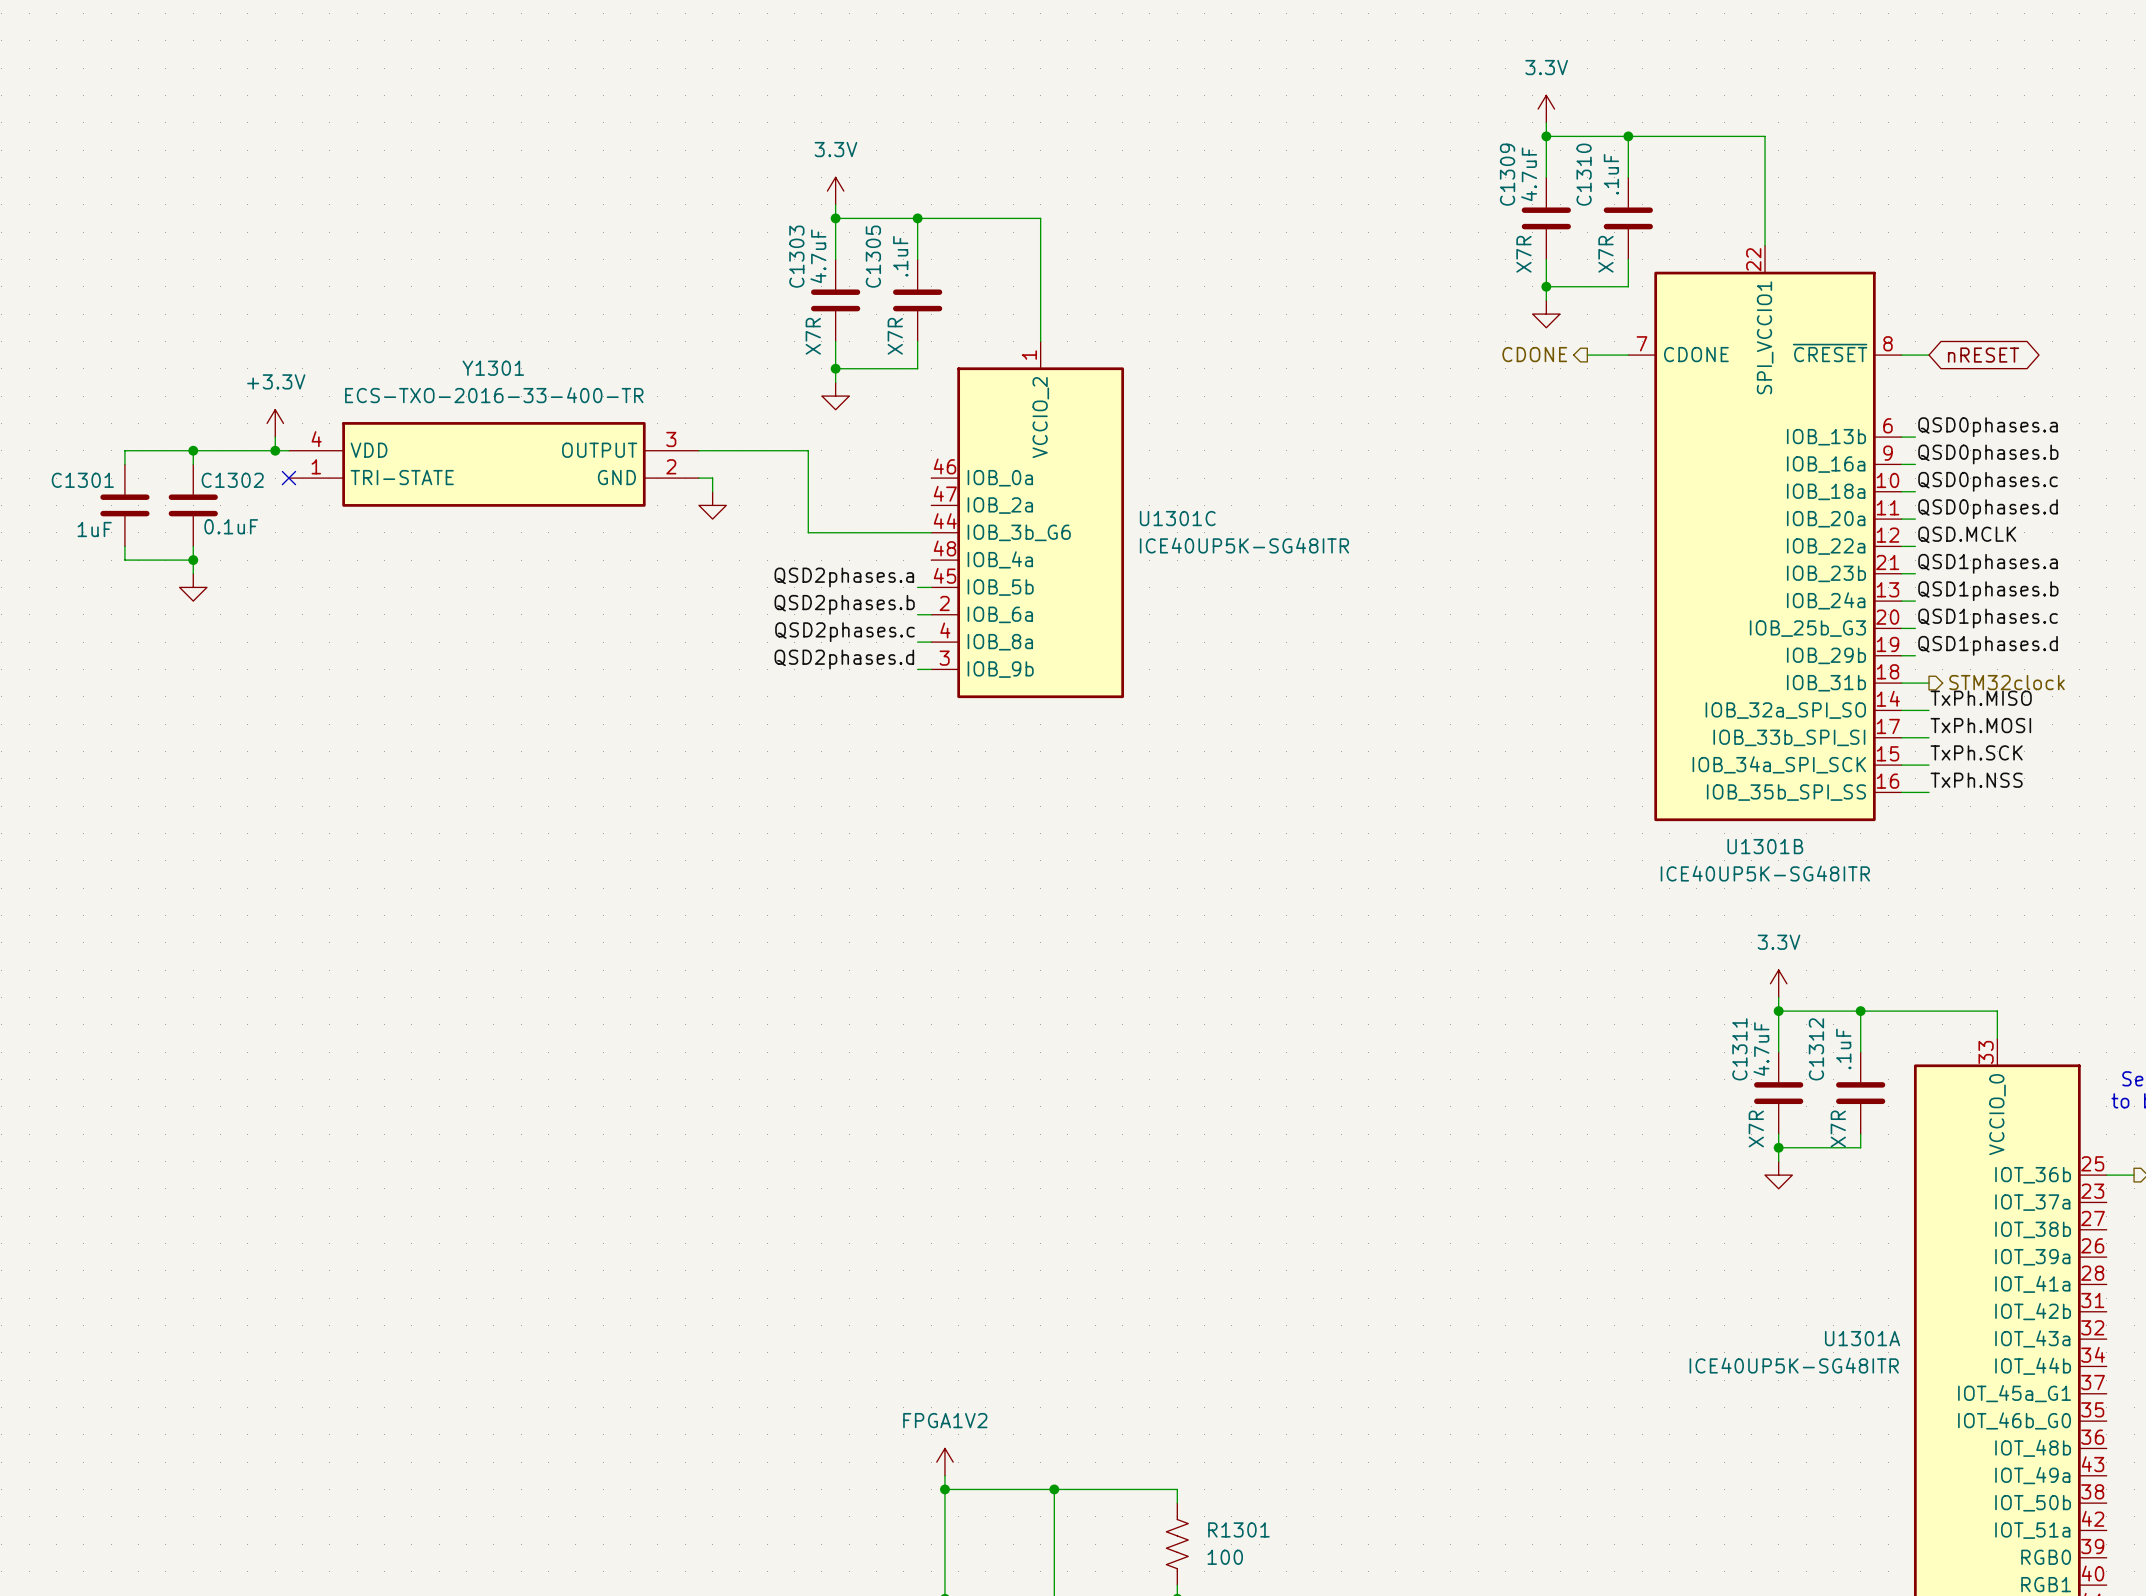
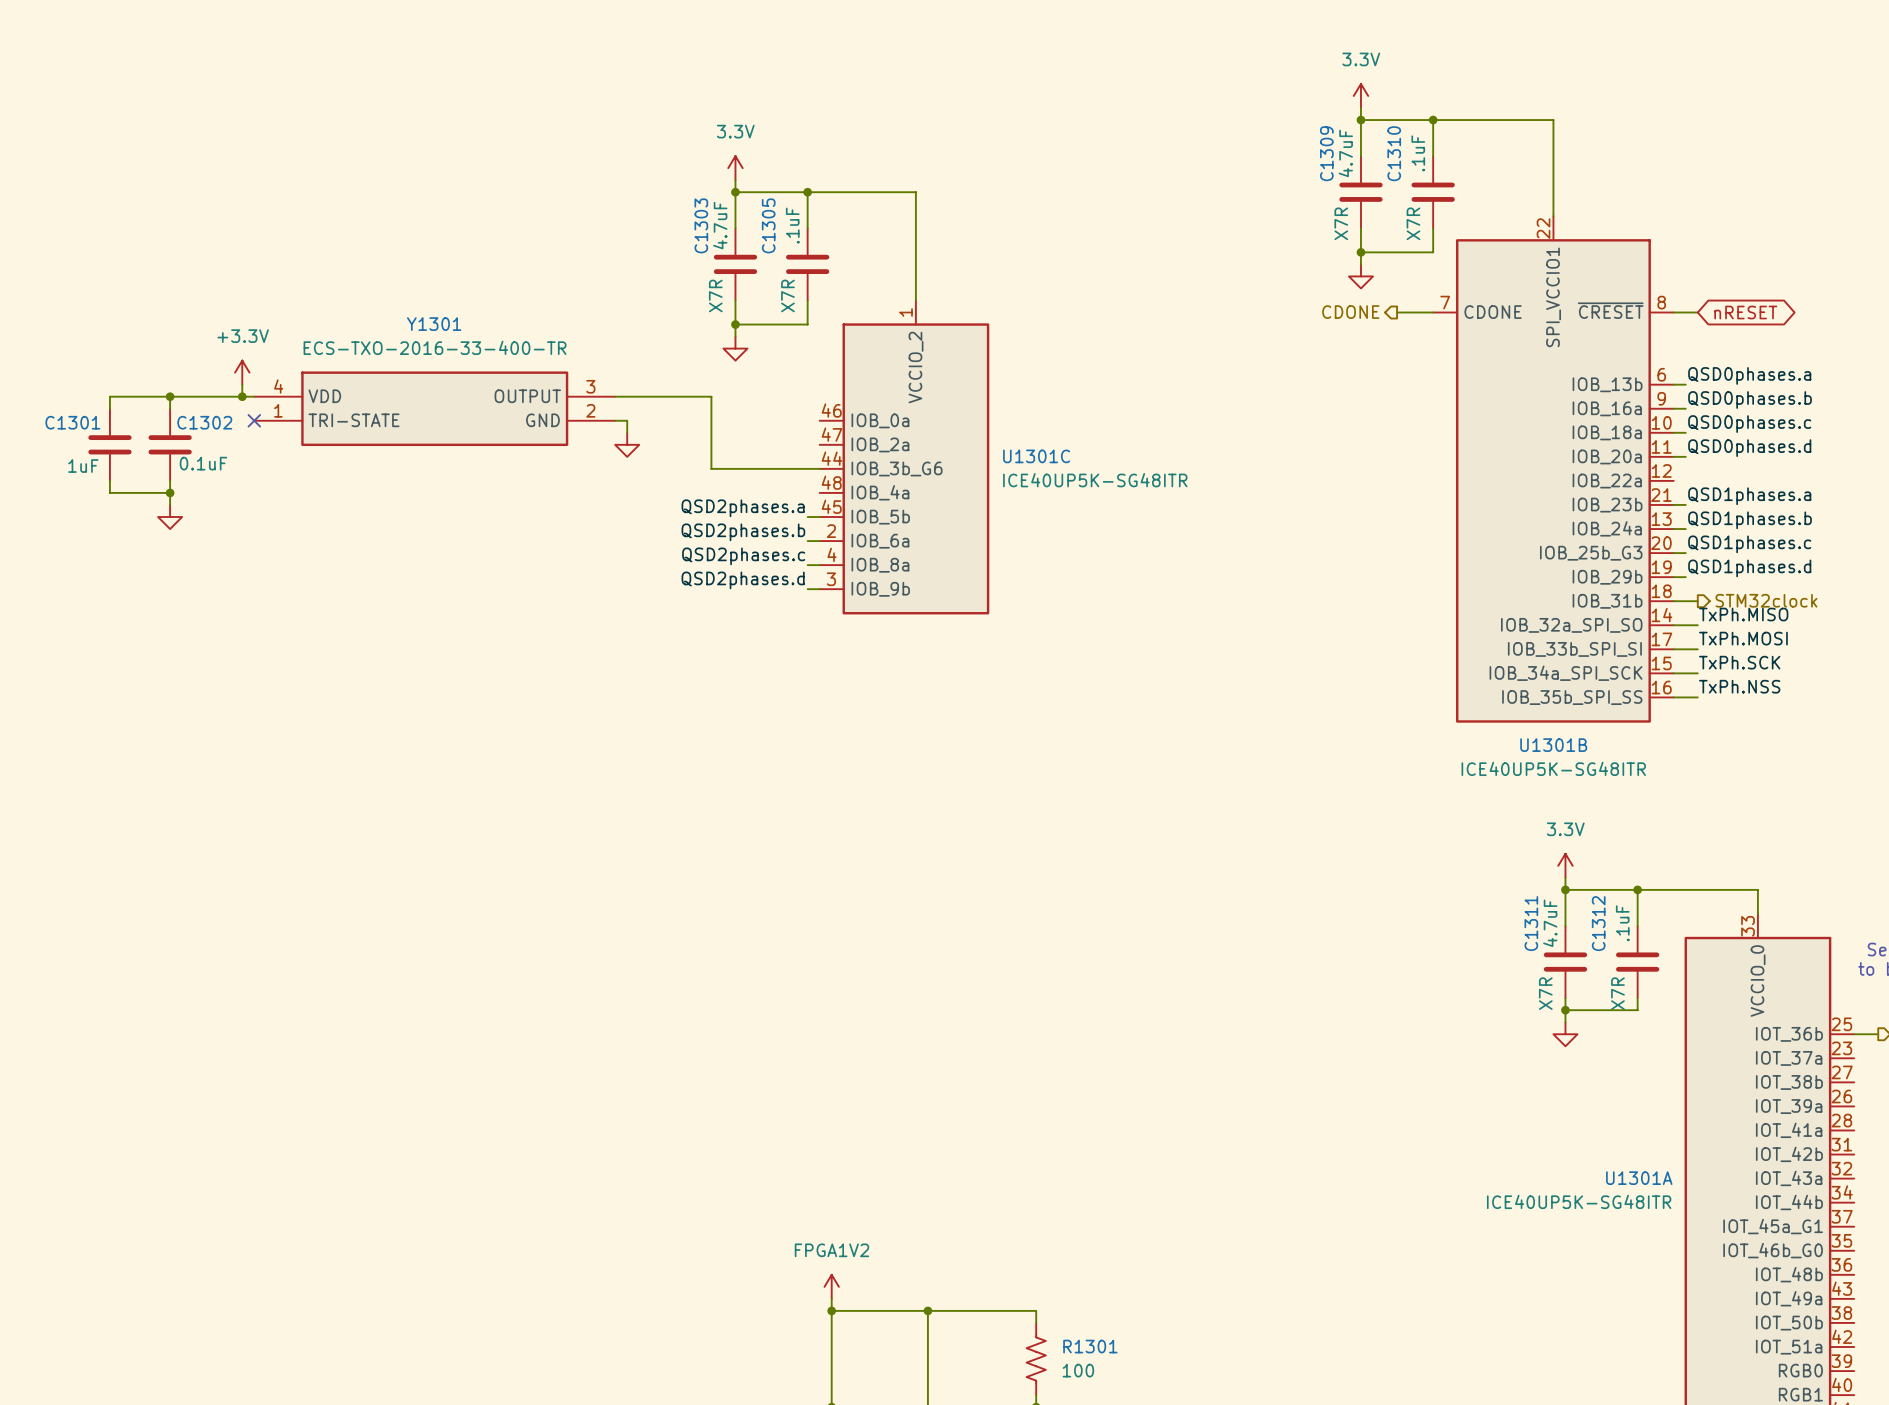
label: QSD.MCLK (1967, 534) -> none
wire: (1901, 546) (1915, 546) -> none

